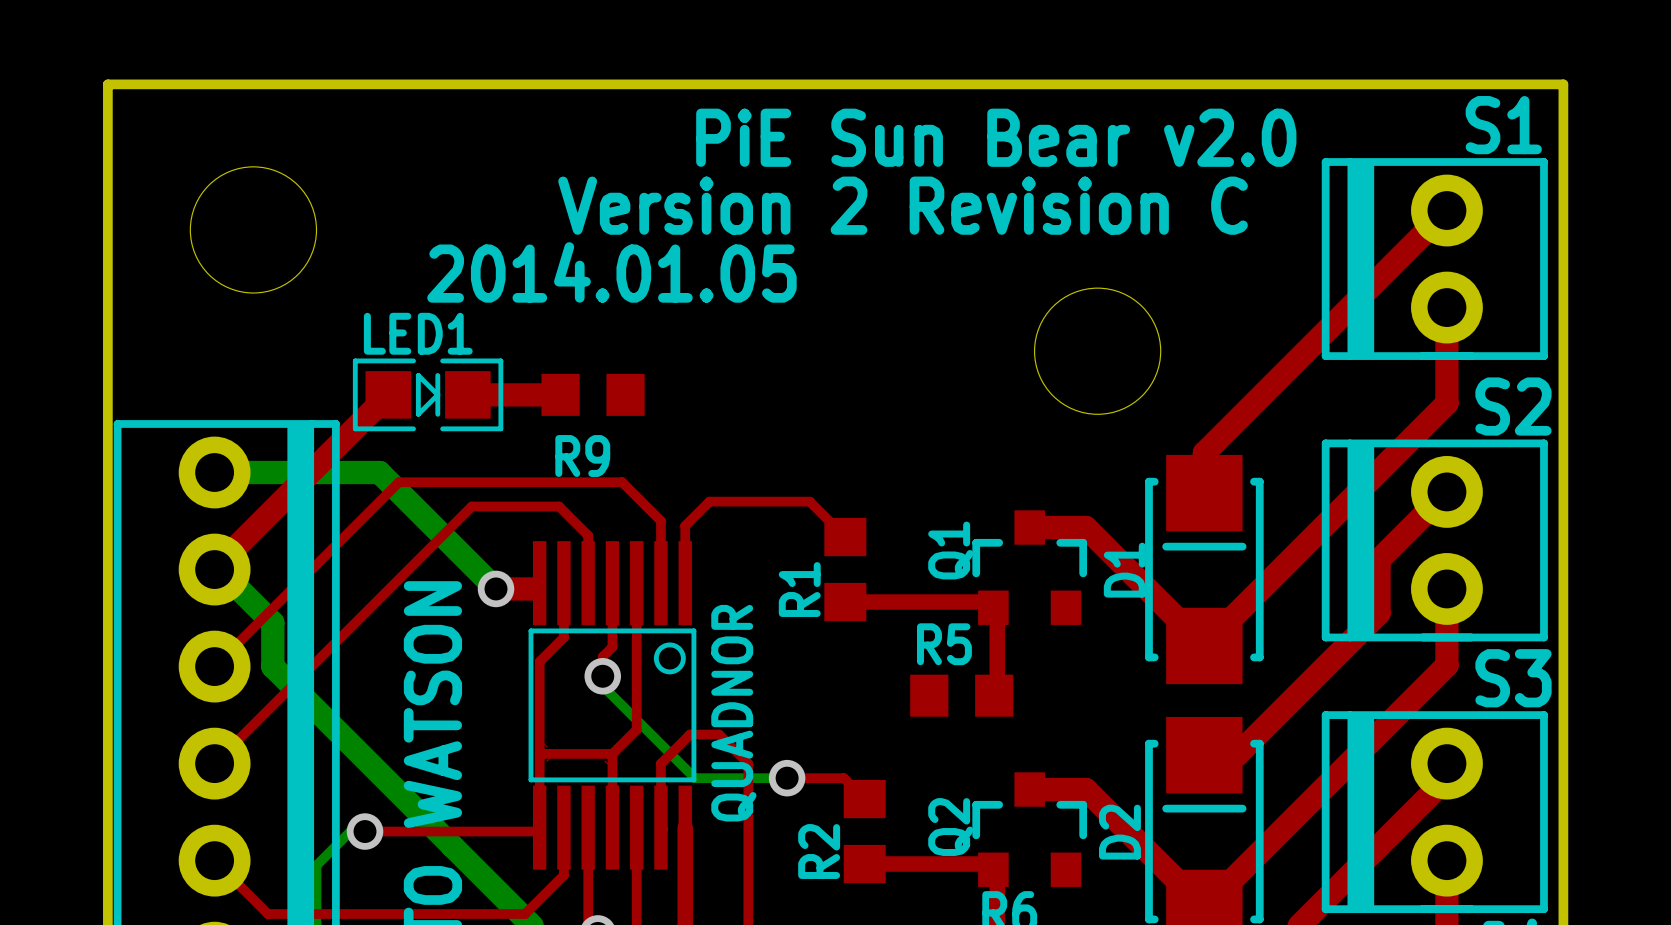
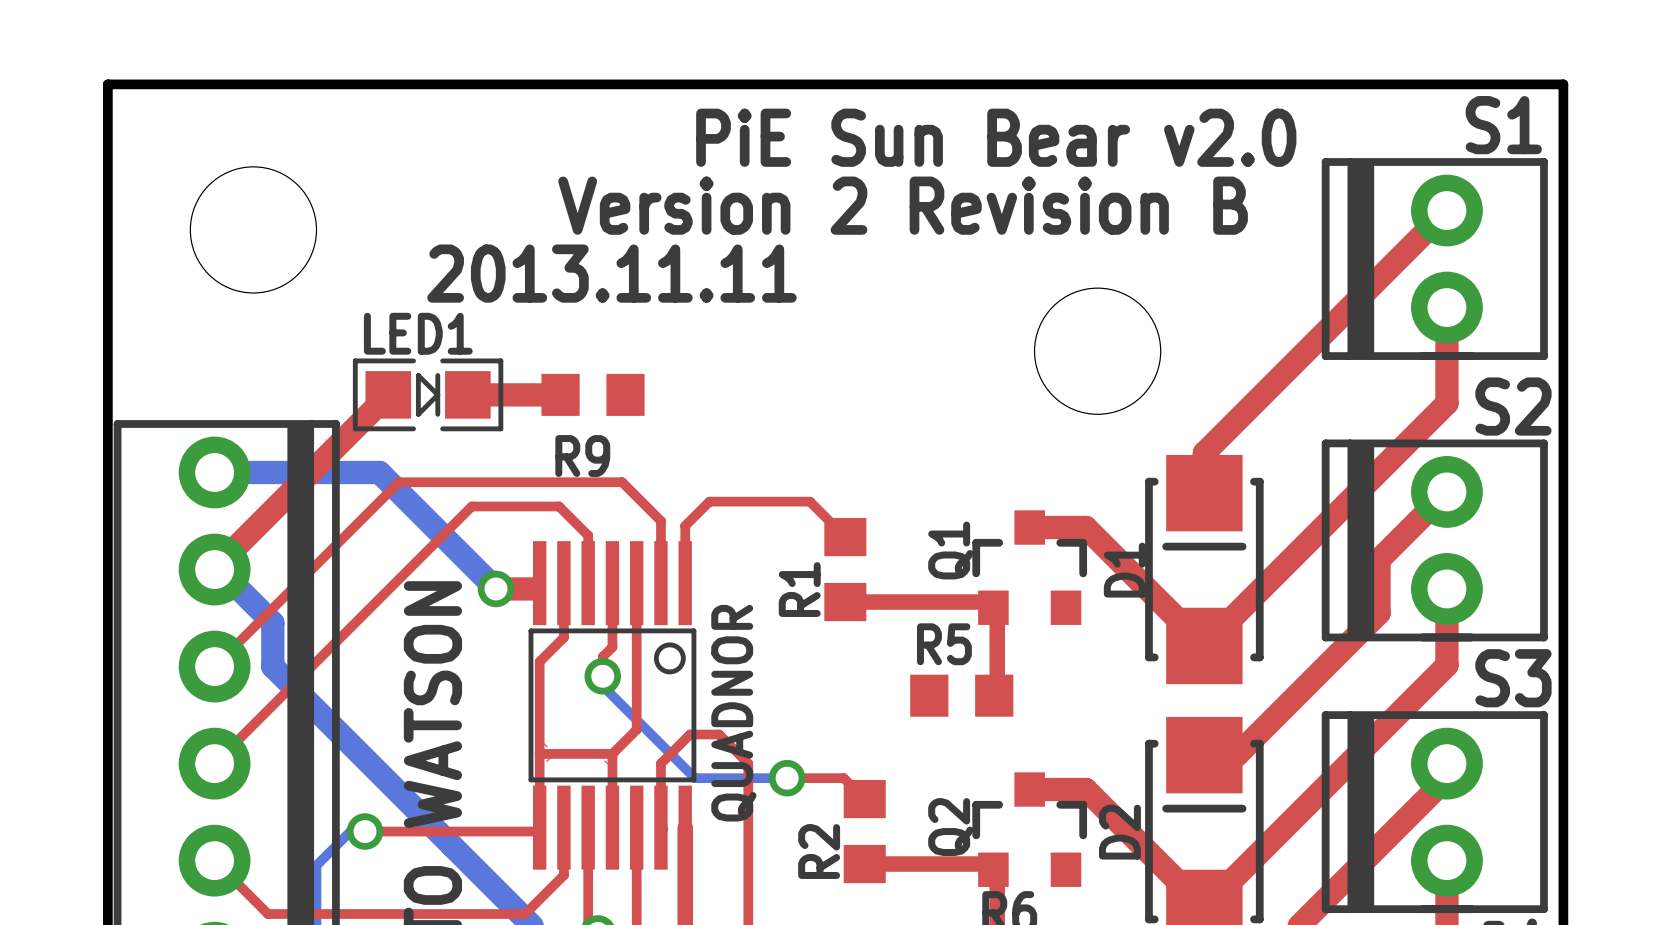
text: Version 2 Revision C (903, 205) -> Version 2 Revision B (903, 205)
text: 2014.01.05 (611, 272) -> 2013.11.11 (611, 273)

